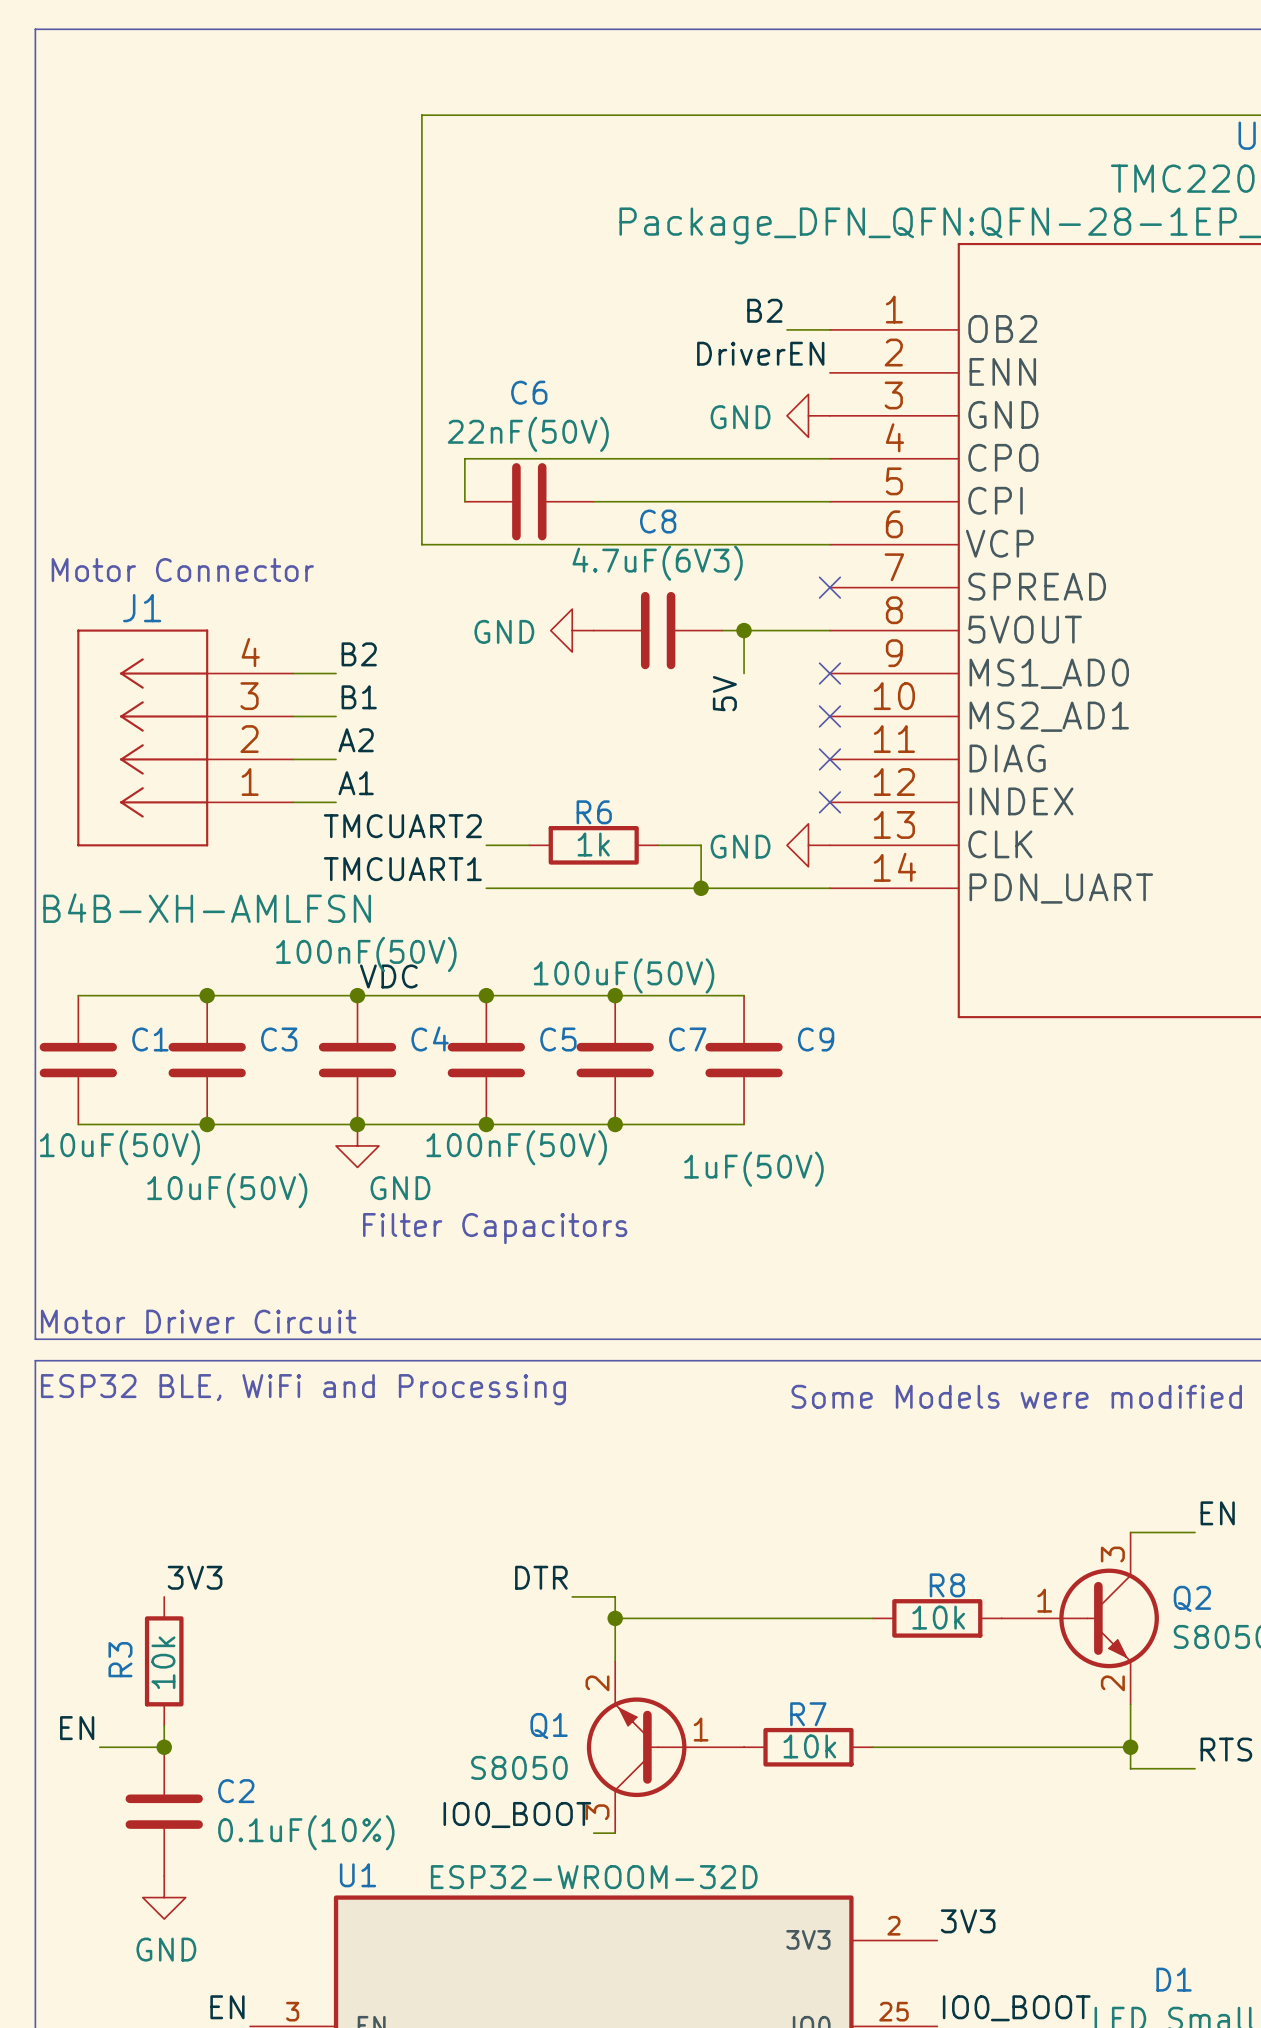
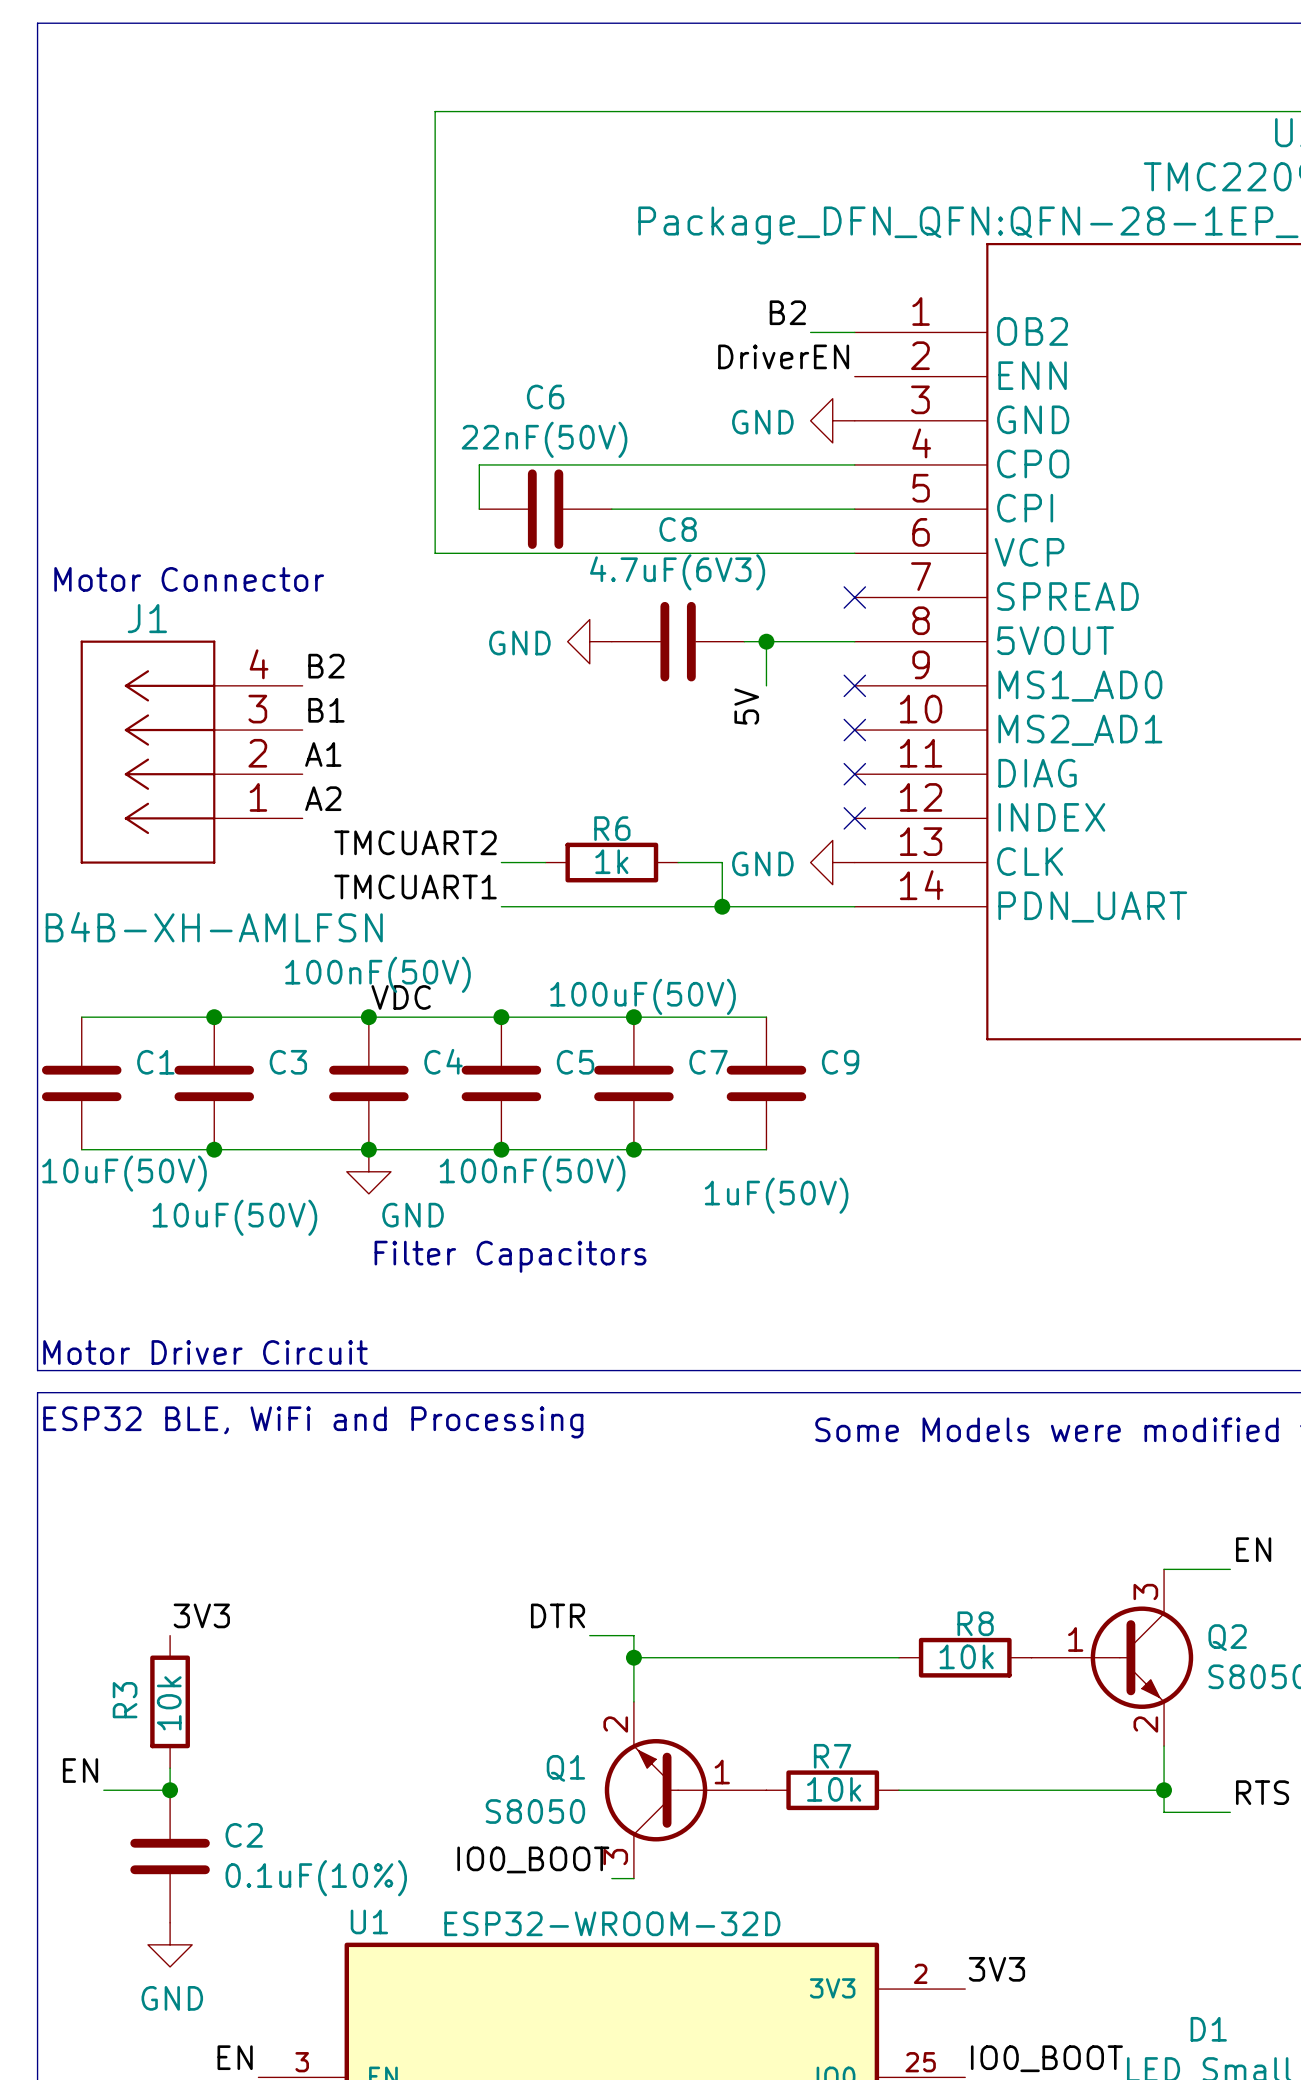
label position: B2 (359, 654) -> B2 (326, 666)
wire: (293, 673) (336, 673) -> none
label position: B1 (359, 697) -> B1 (326, 710)
wire: (293, 716) (336, 716) -> none
label position: A2 (356, 740) -> A2 (323, 798)
wire: (293, 759) (336, 759) -> none
label position: A1 (356, 783) -> A1 (323, 754)
wire: (293, 802) (336, 802) -> none

